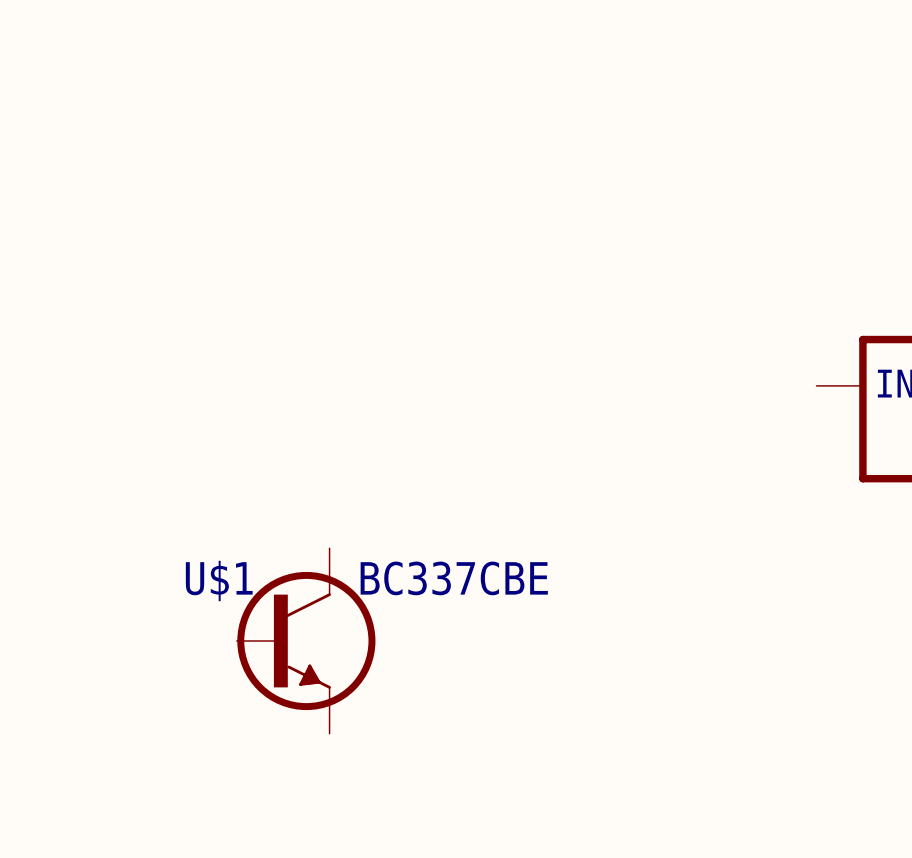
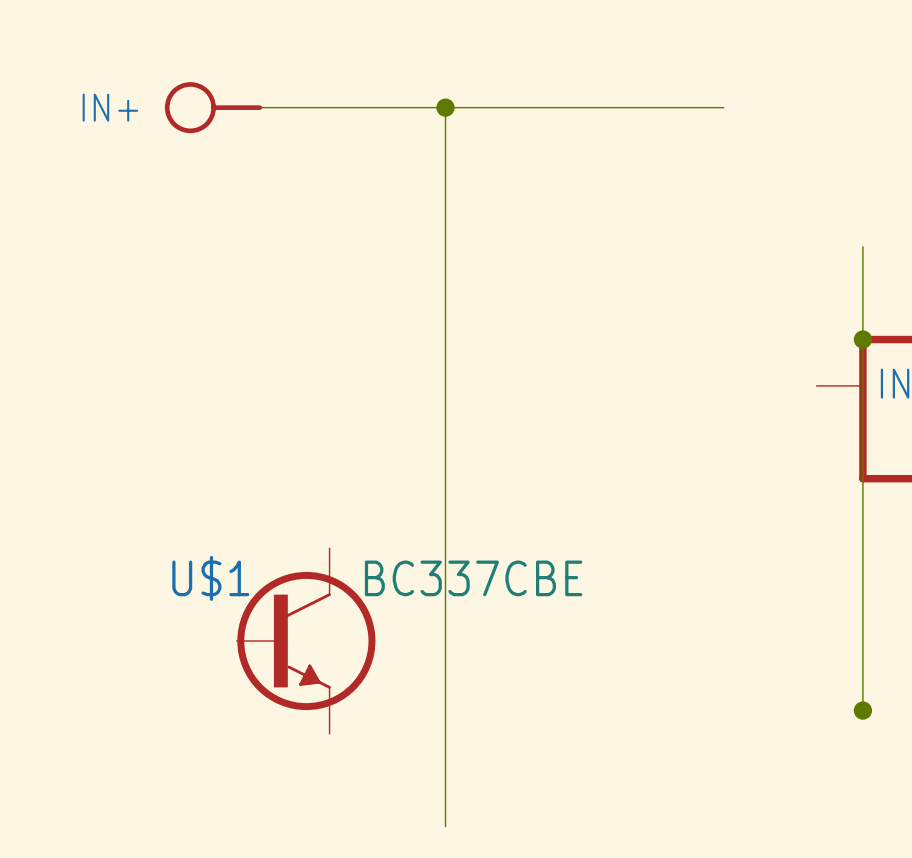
IN+: none -> (213, 107)
wire: none -> (259, 107) (723, 107)
wire: none -> (445, 107) (445, 826)
junction: none -> (445, 107)
wire: none -> (862, 246) (862, 710)
junction: none -> (862, 339)
junction: none -> (862, 710)

